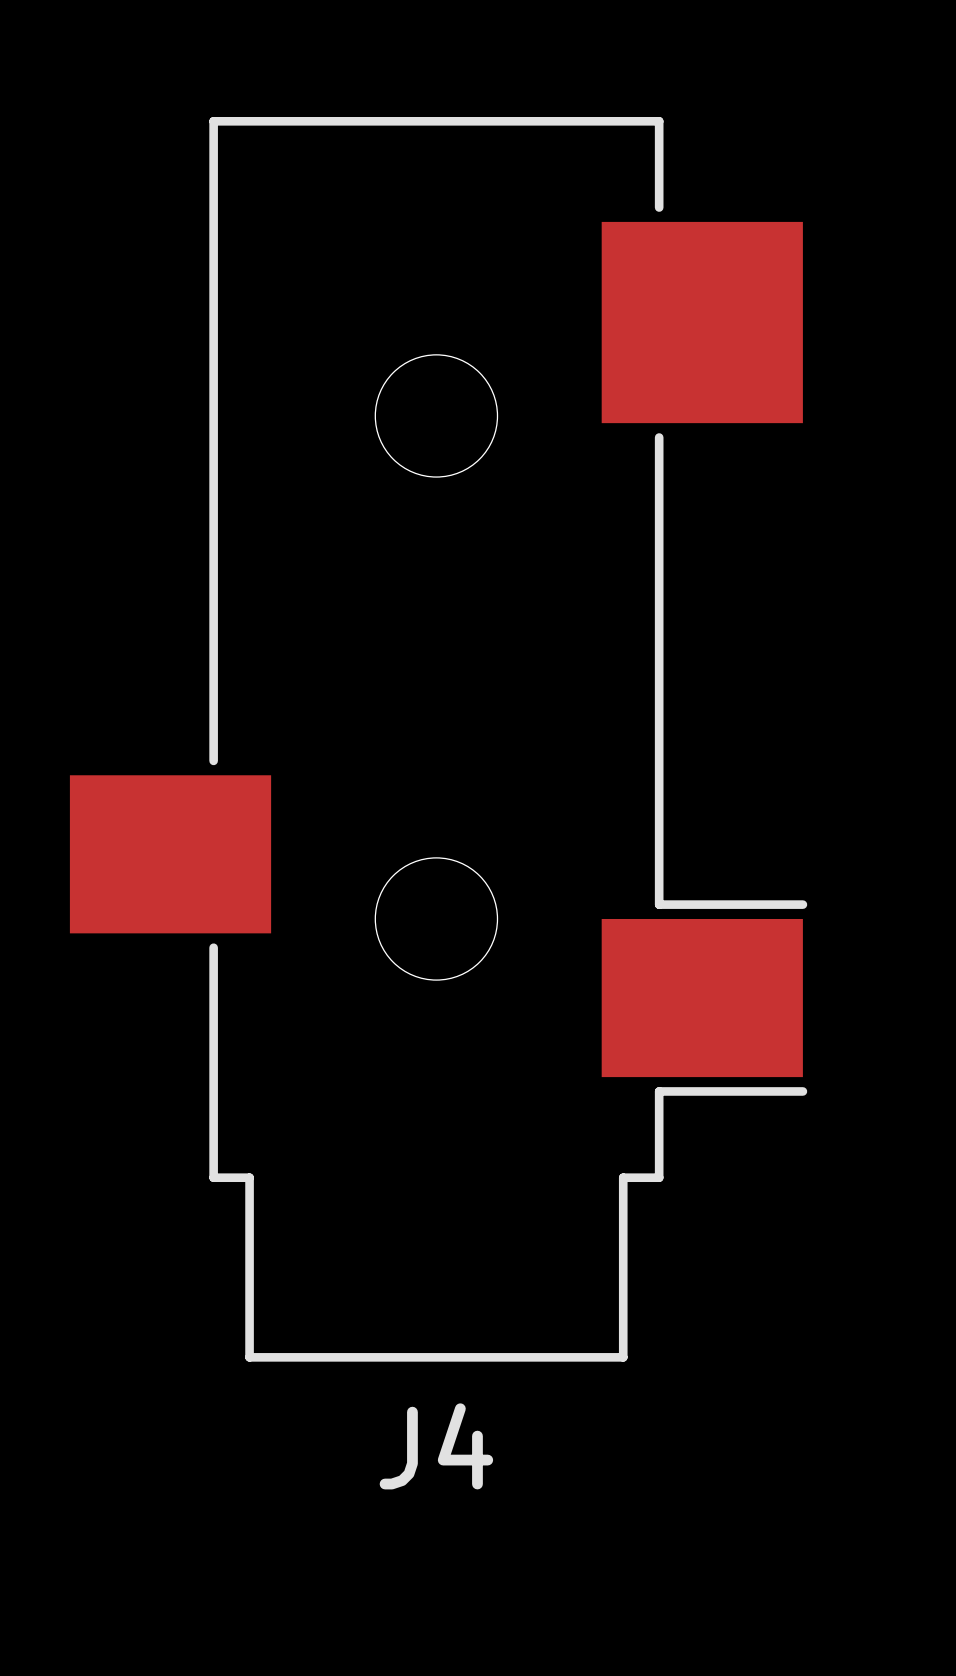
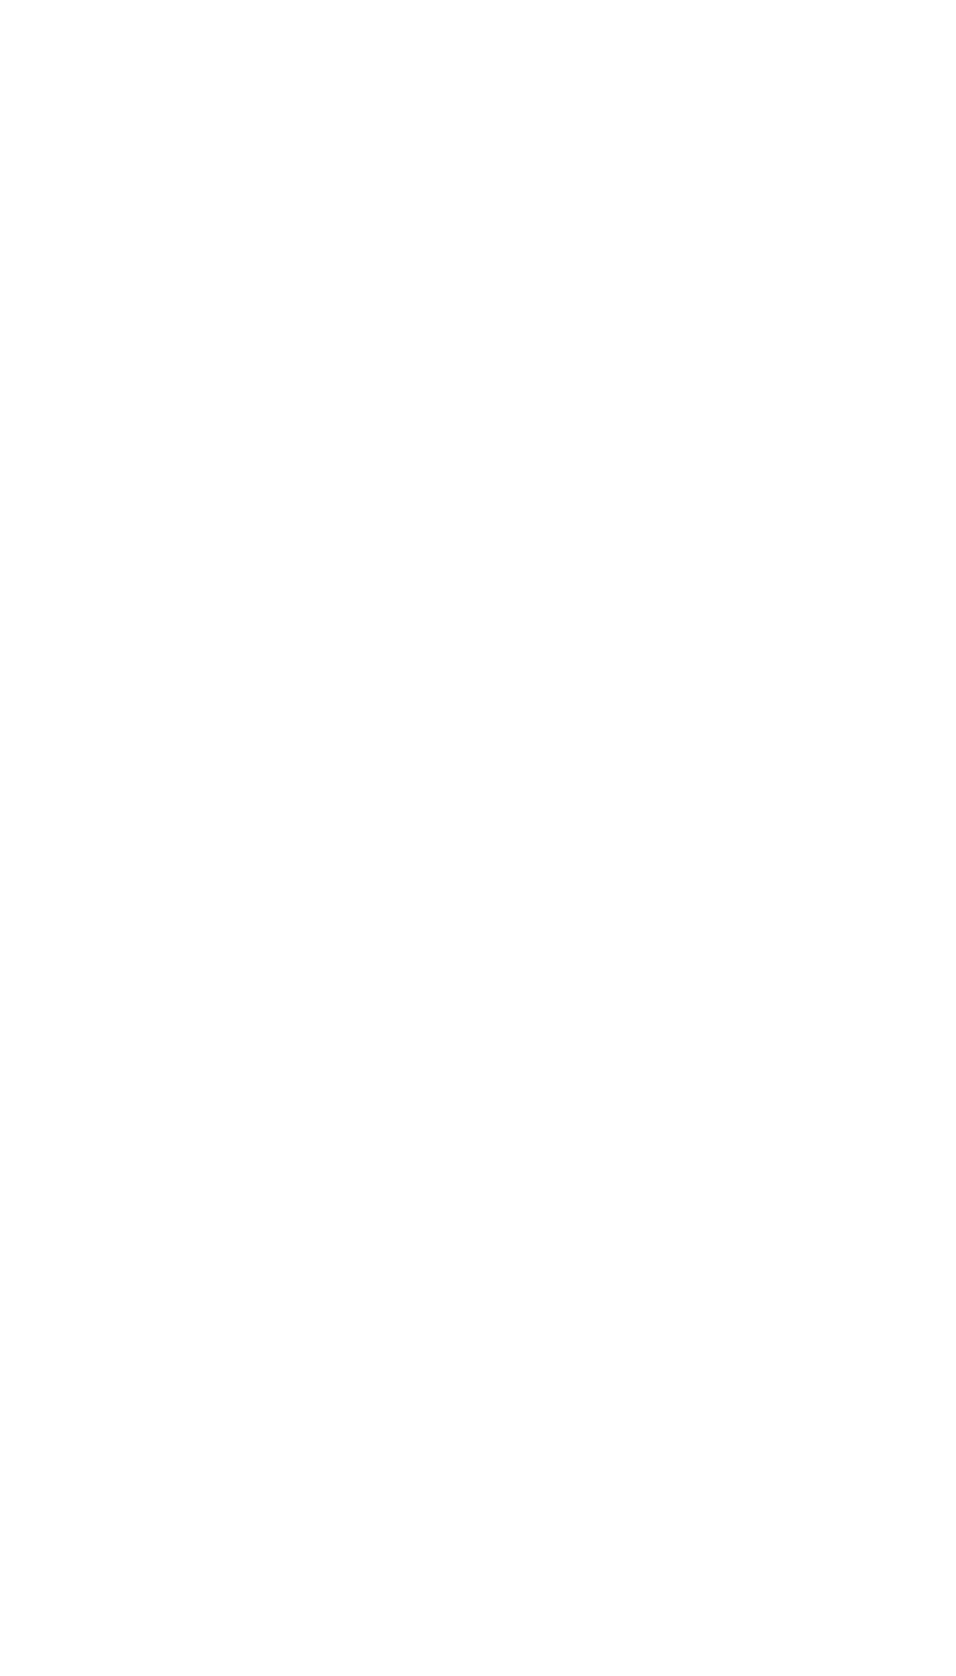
J4: (438, 739) -> none

